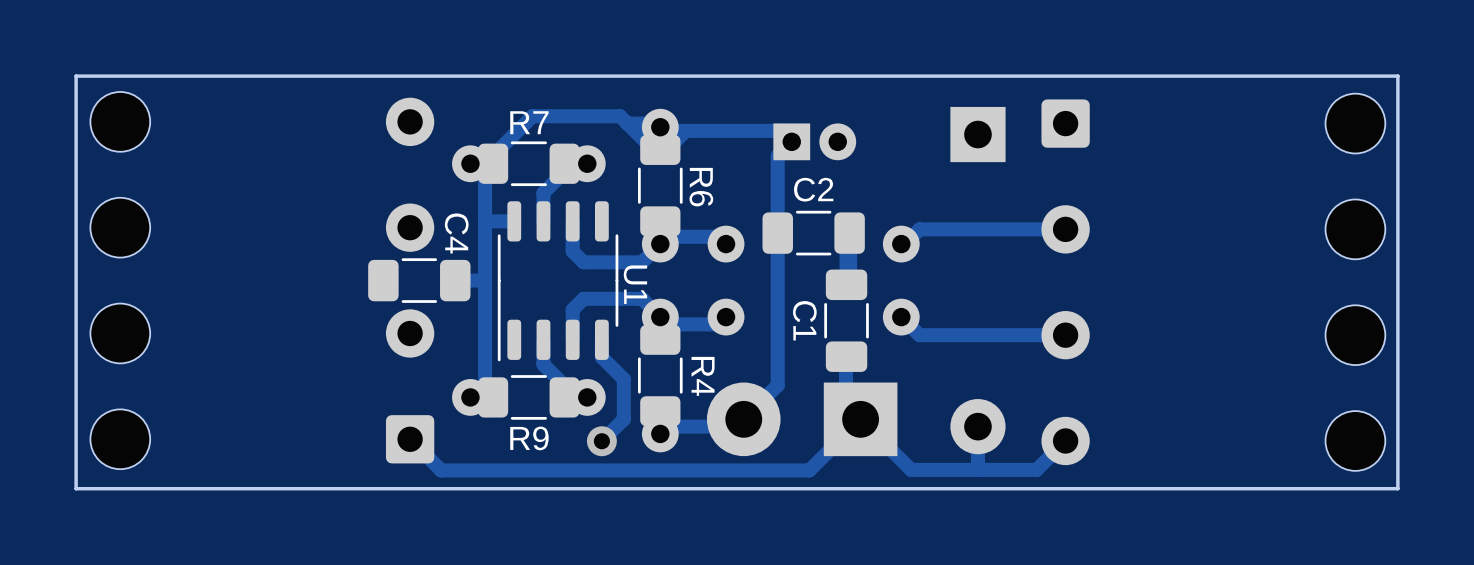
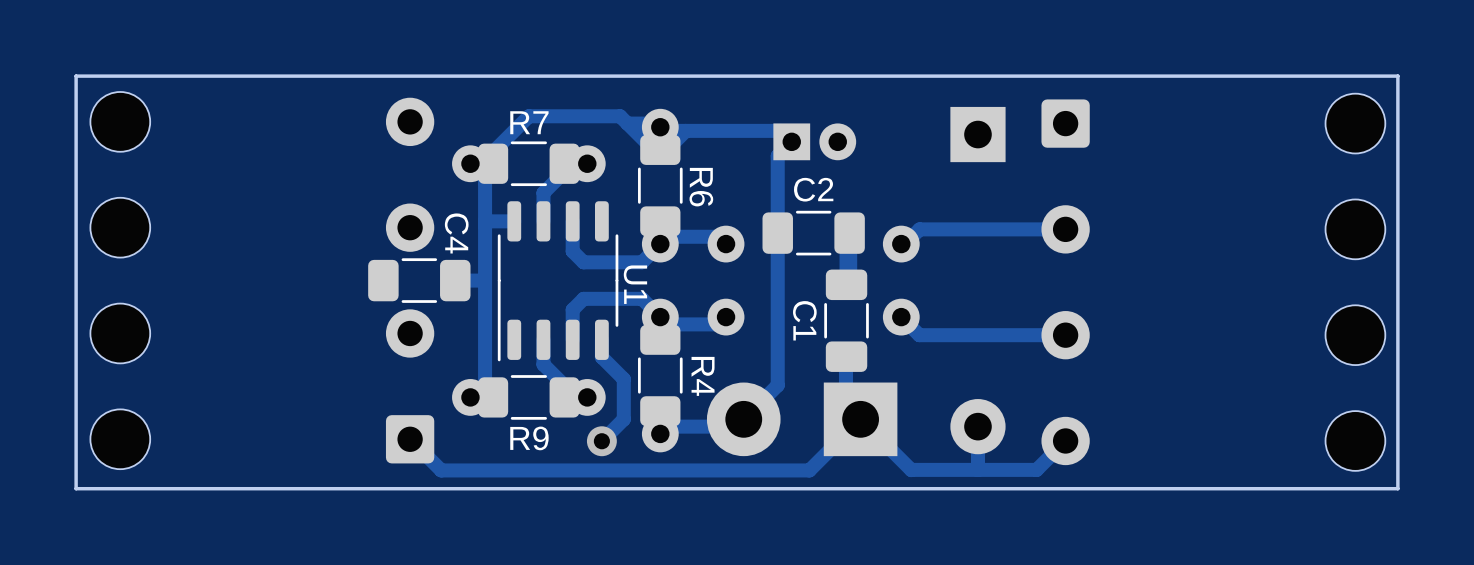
track: (532, 116) (499, 149) -> (532, 116) (528, 116) (488, 156)

